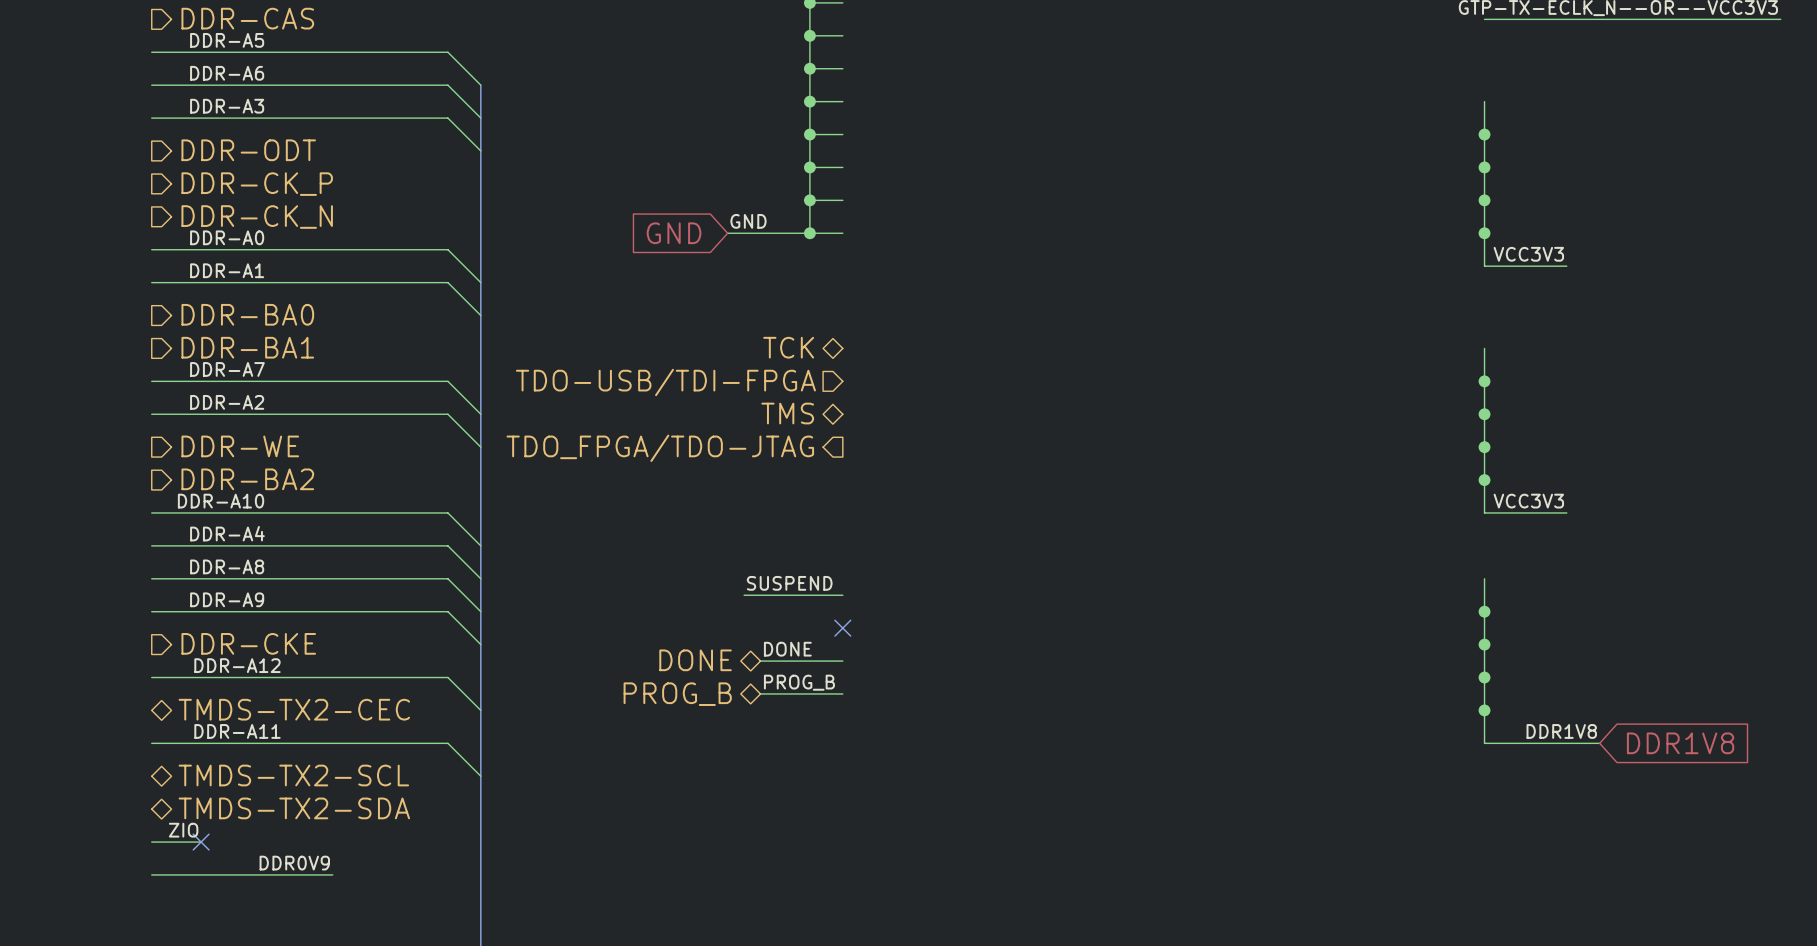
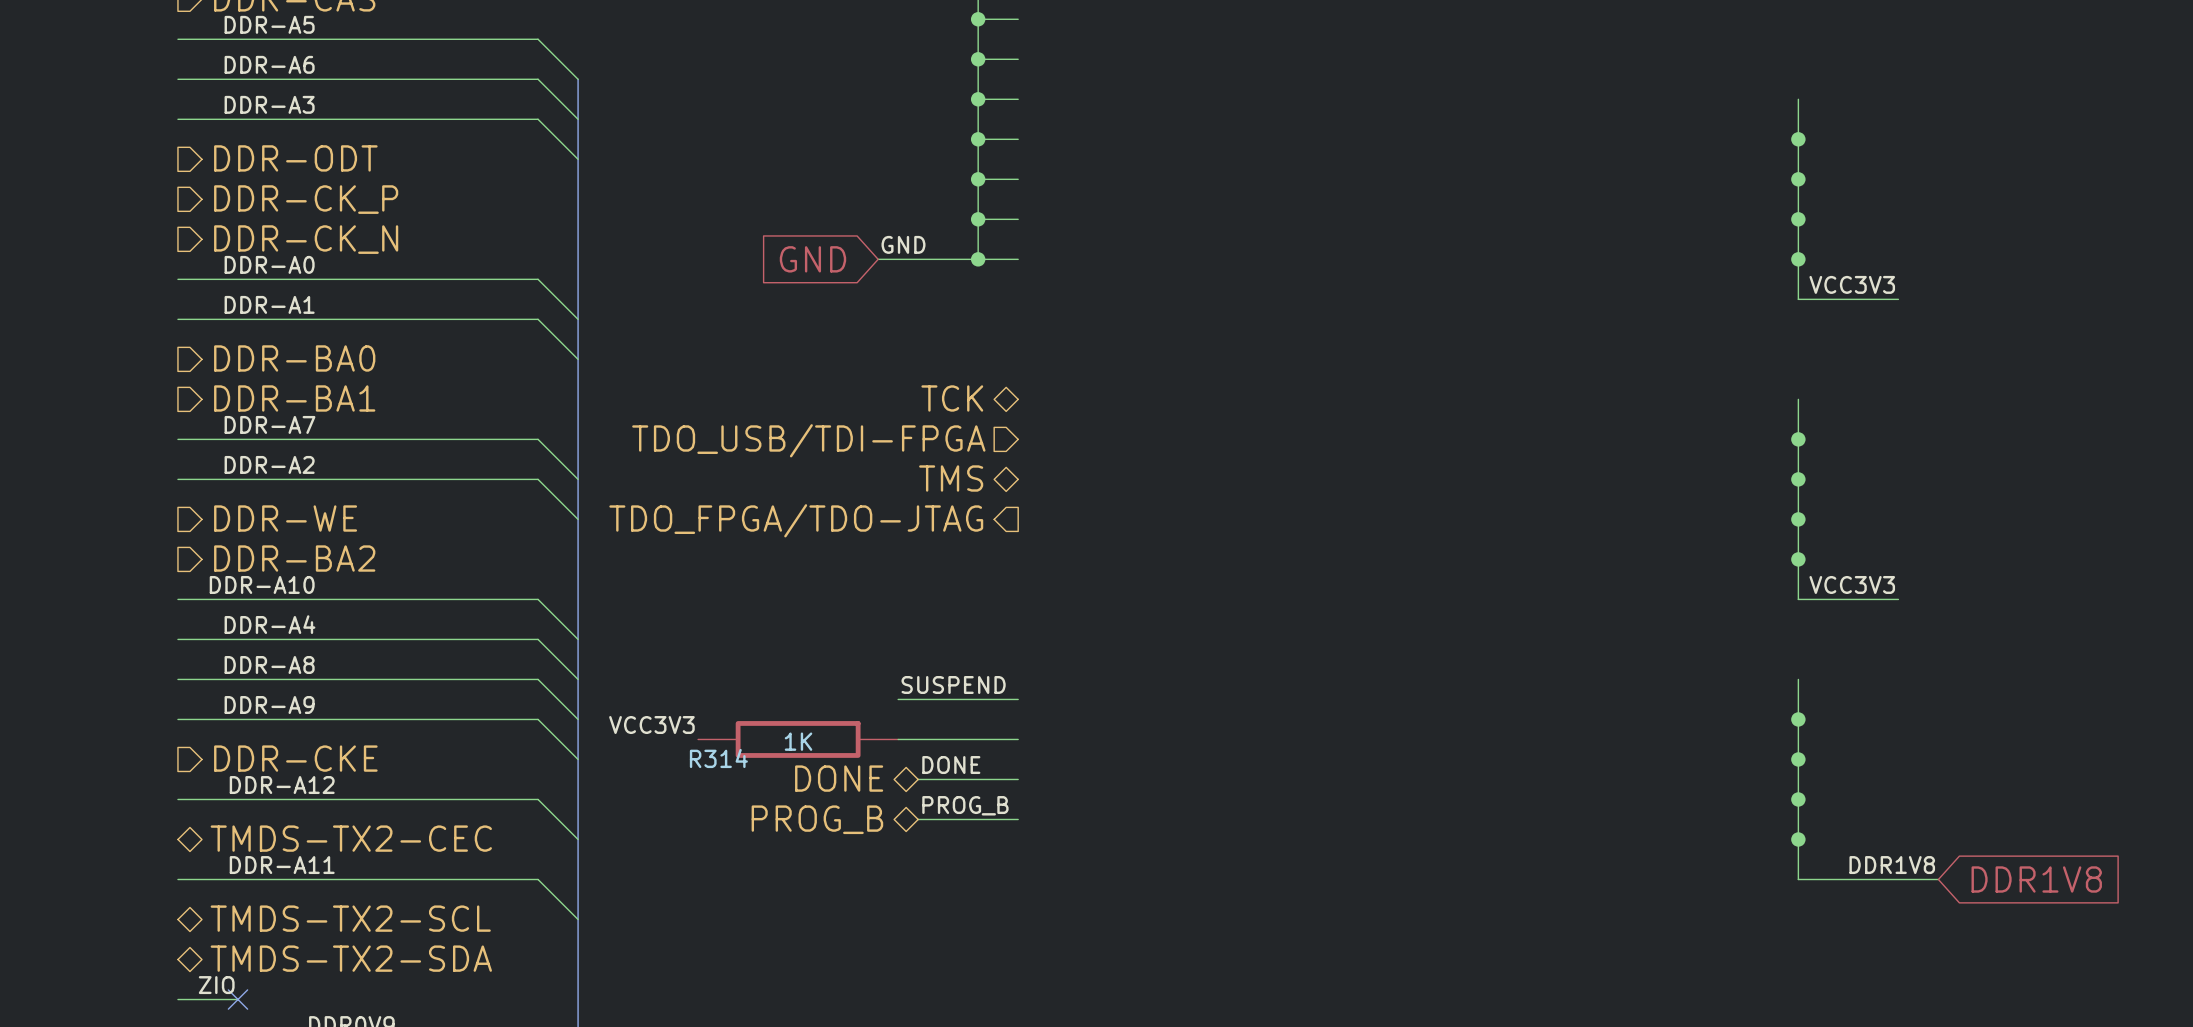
hierarchical label: TDO-USB/TDI-FPGA (665, 382) -> TDO_USB/TDI-FPGA (808, 440)
label: none -> VCC3V3 (651, 725)
R314: none -> 1K (798, 739)
wire: none -> (898, 739) (1018, 739)
no-connect mark: (842, 628) -> none

